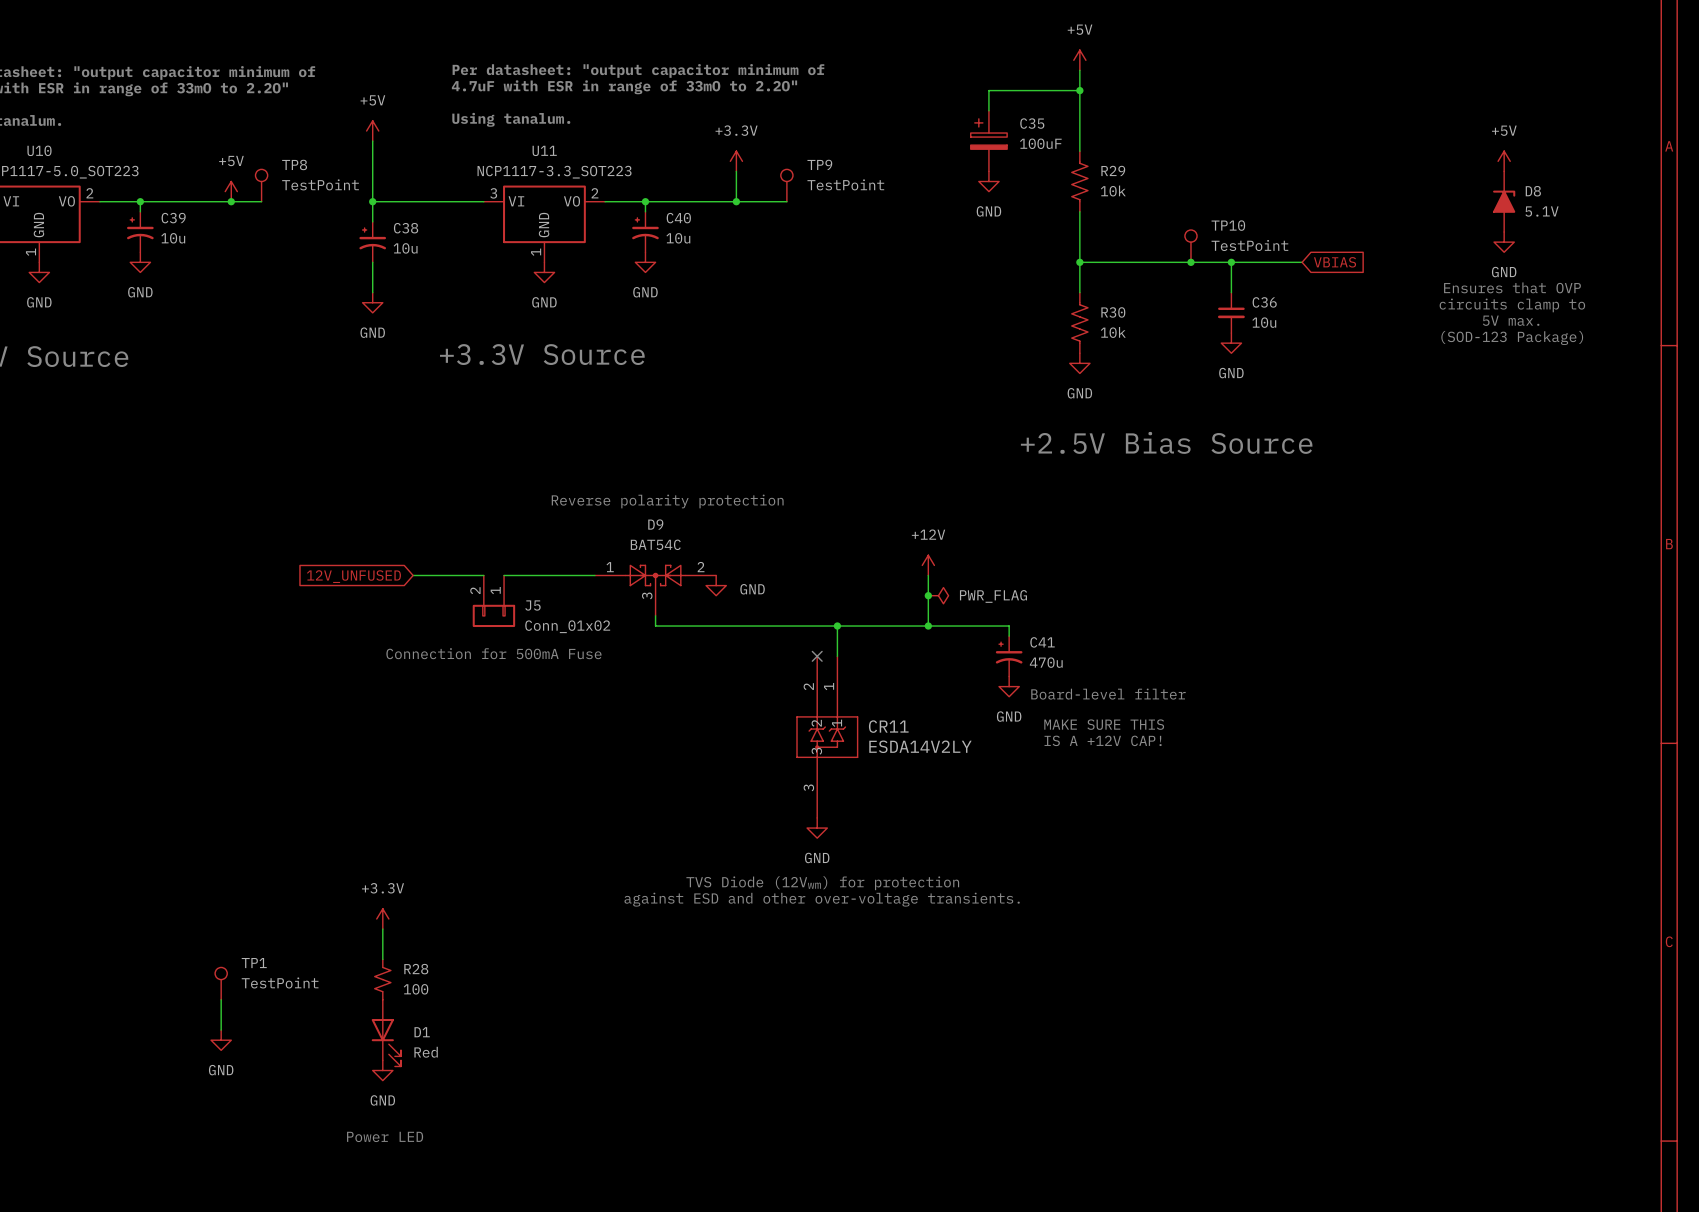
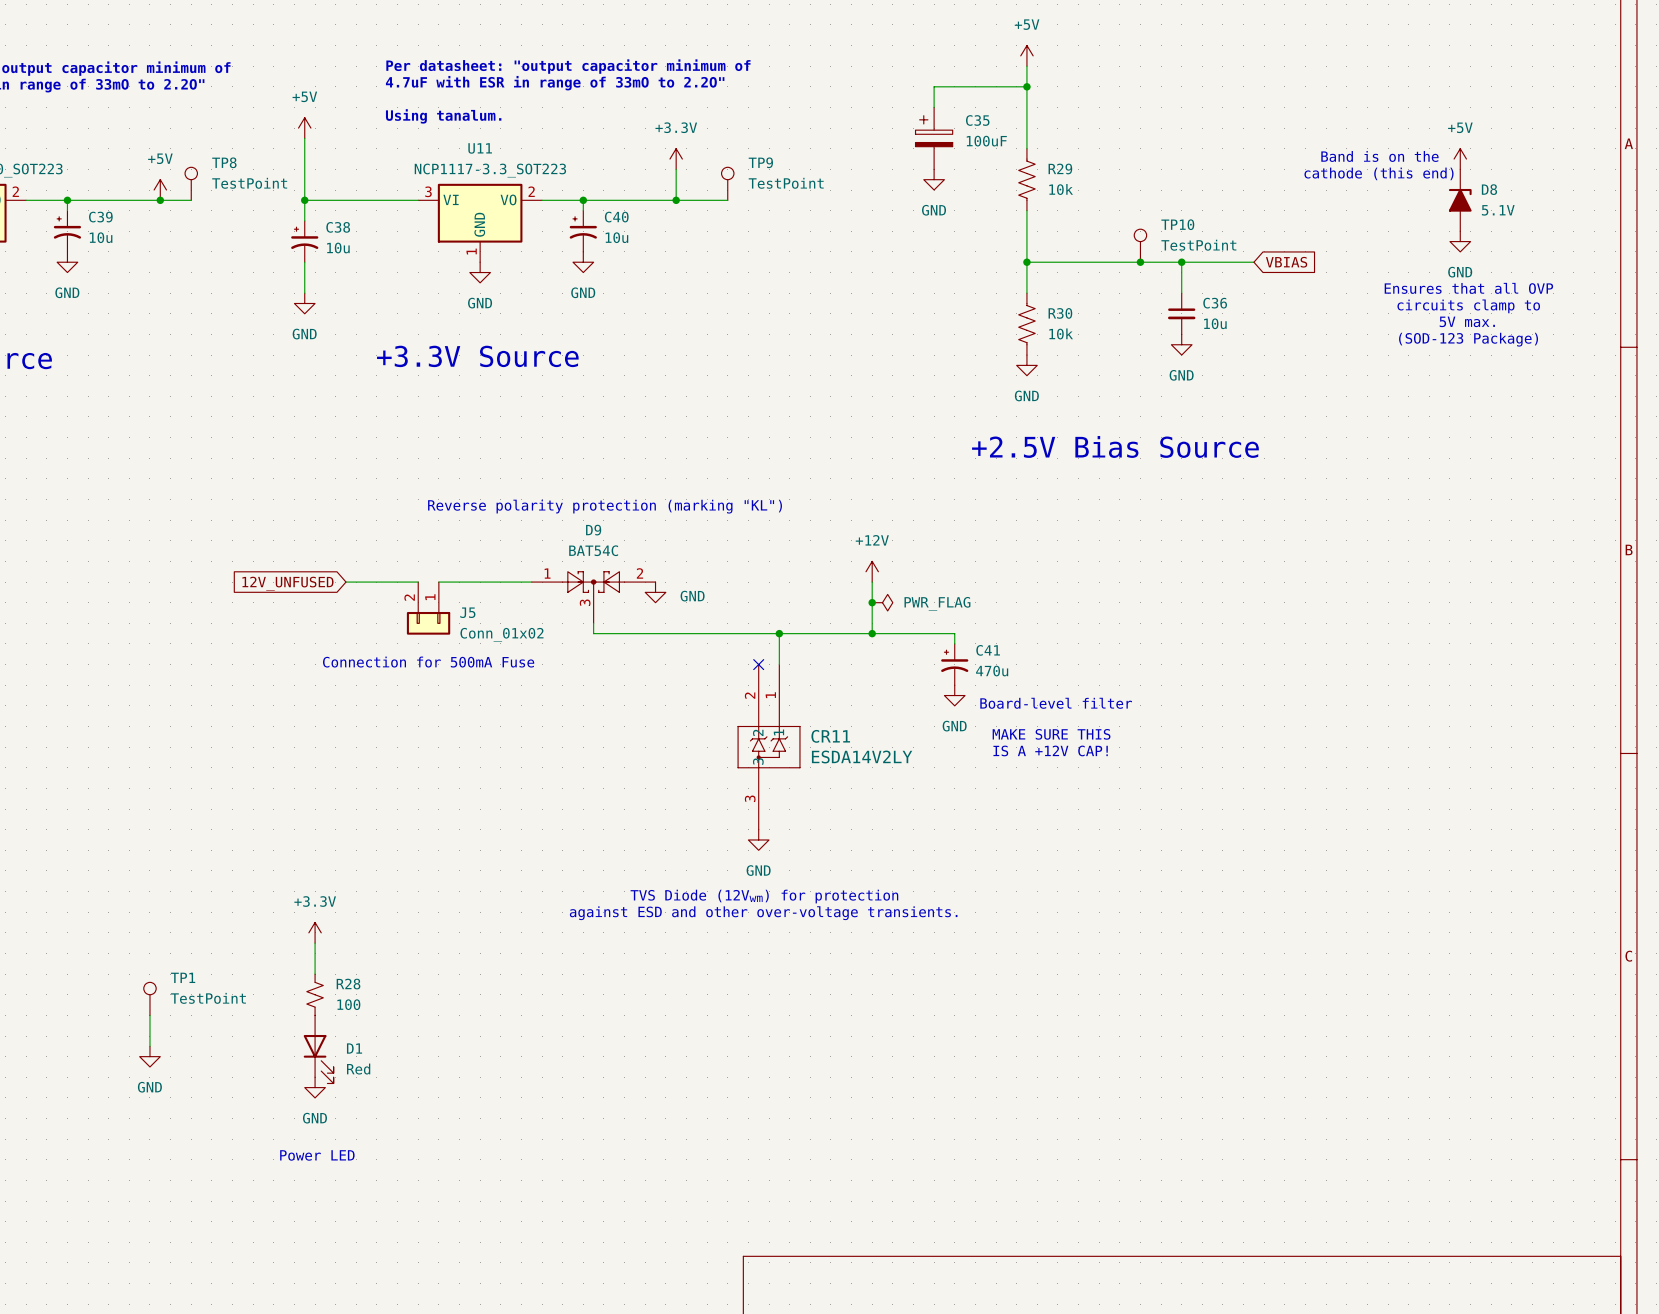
text: none -> Band is on the (1379, 156)
text: none -> cathode (this end) (1379, 173)
text: Ensures that OVP (1512, 287) -> Ensures that all OVP (1468, 288)
text: Reverse polarity protection (667, 501) -> Reverse polarity protection (marking "KL") (605, 506)

